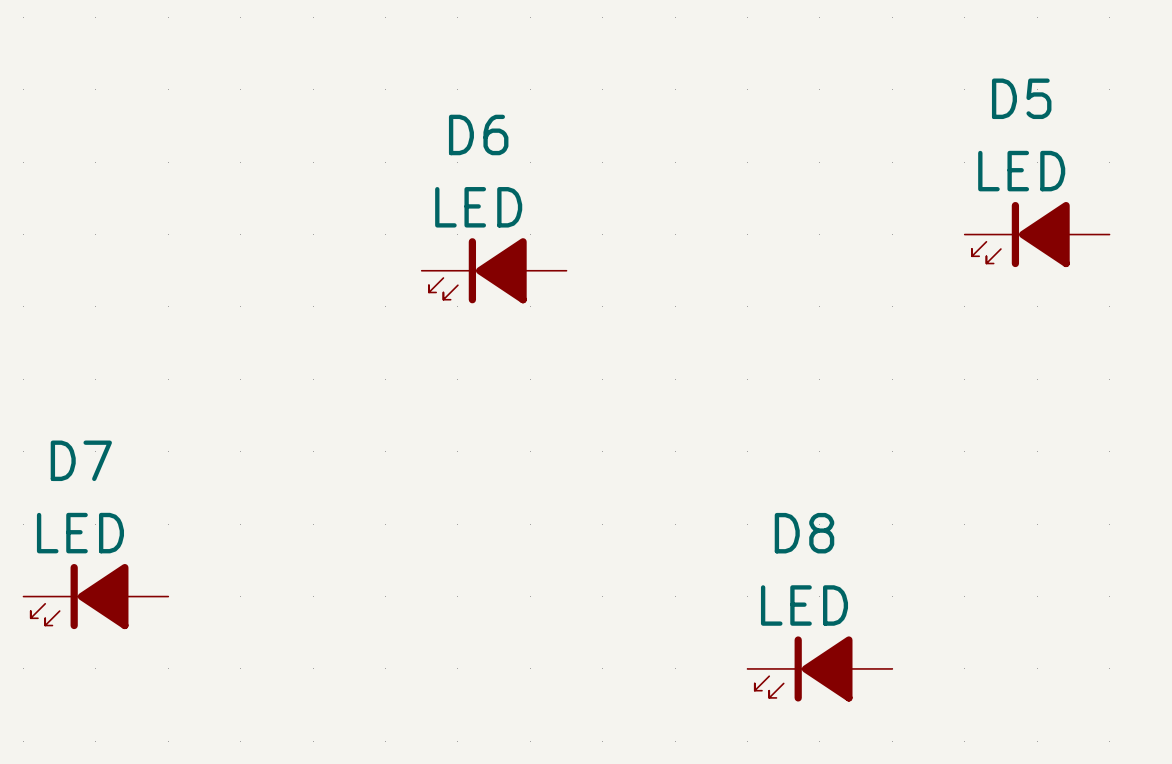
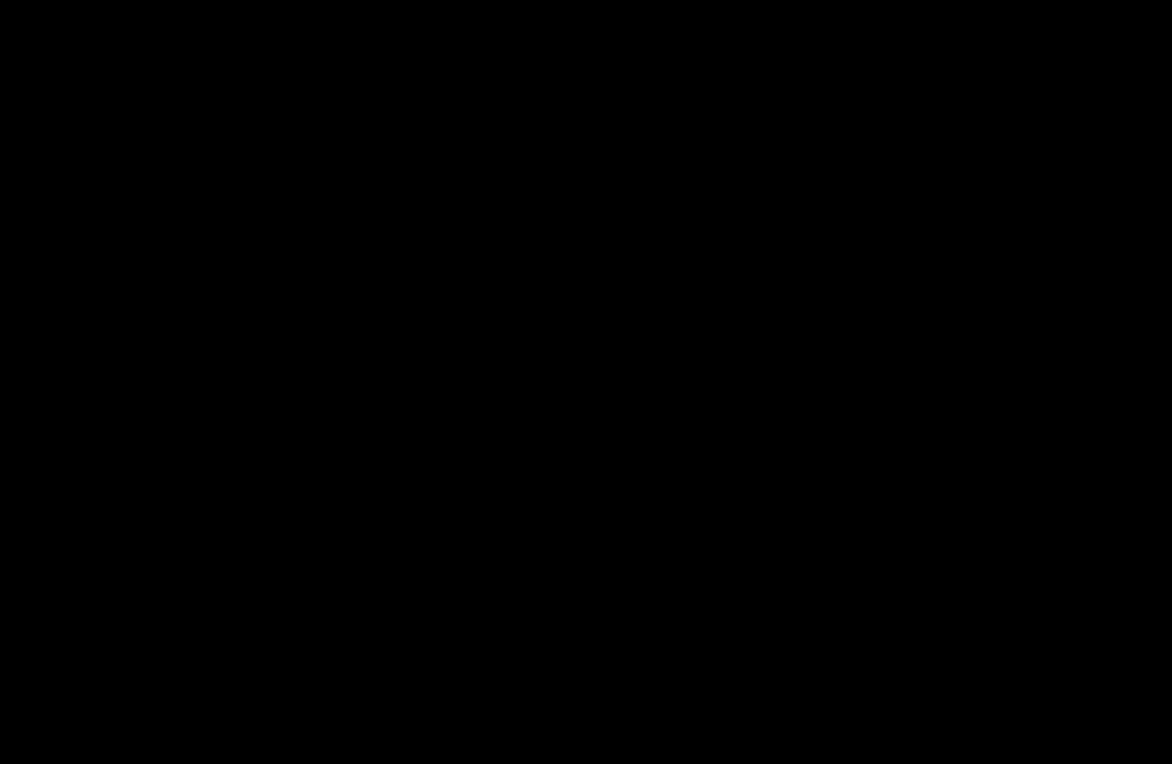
D5: LED (1037, 234) -> none
D6: LED (494, 270) -> none
D7: LED (95, 596) -> none
D8: LED (819, 668) -> none

